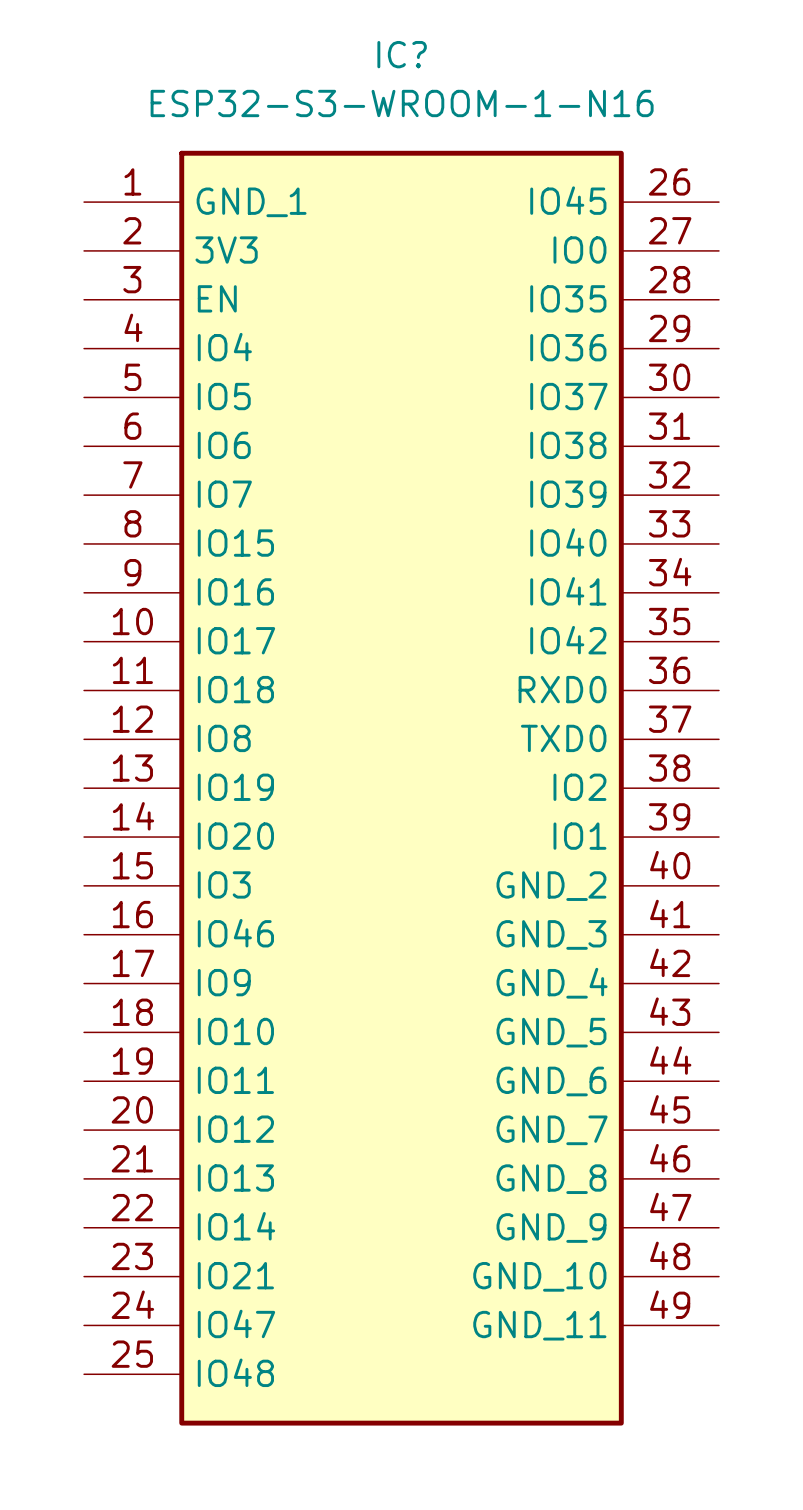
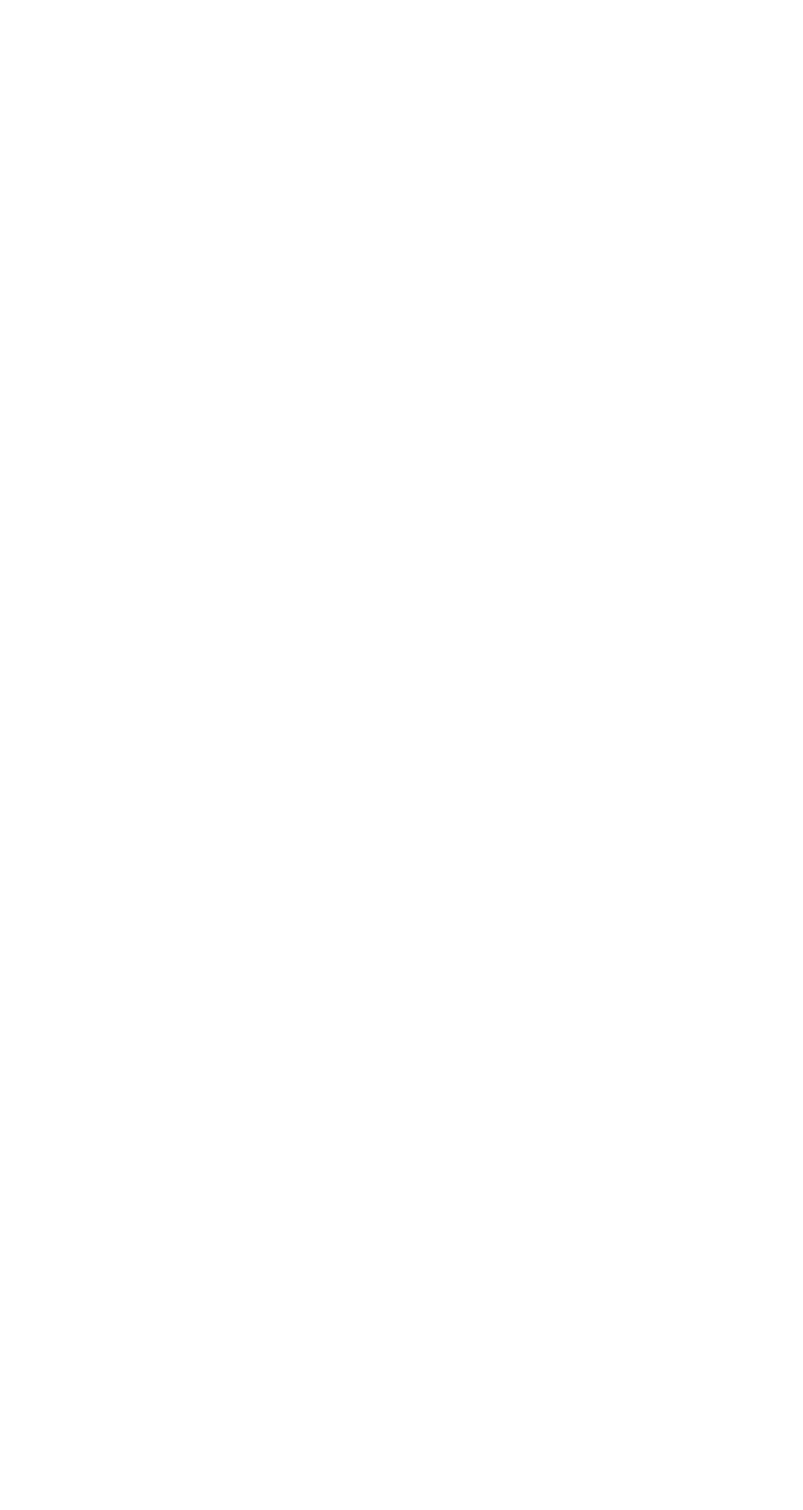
IC?: ESP32-S3-WROOM-1-N16 (401, 788) -> none

